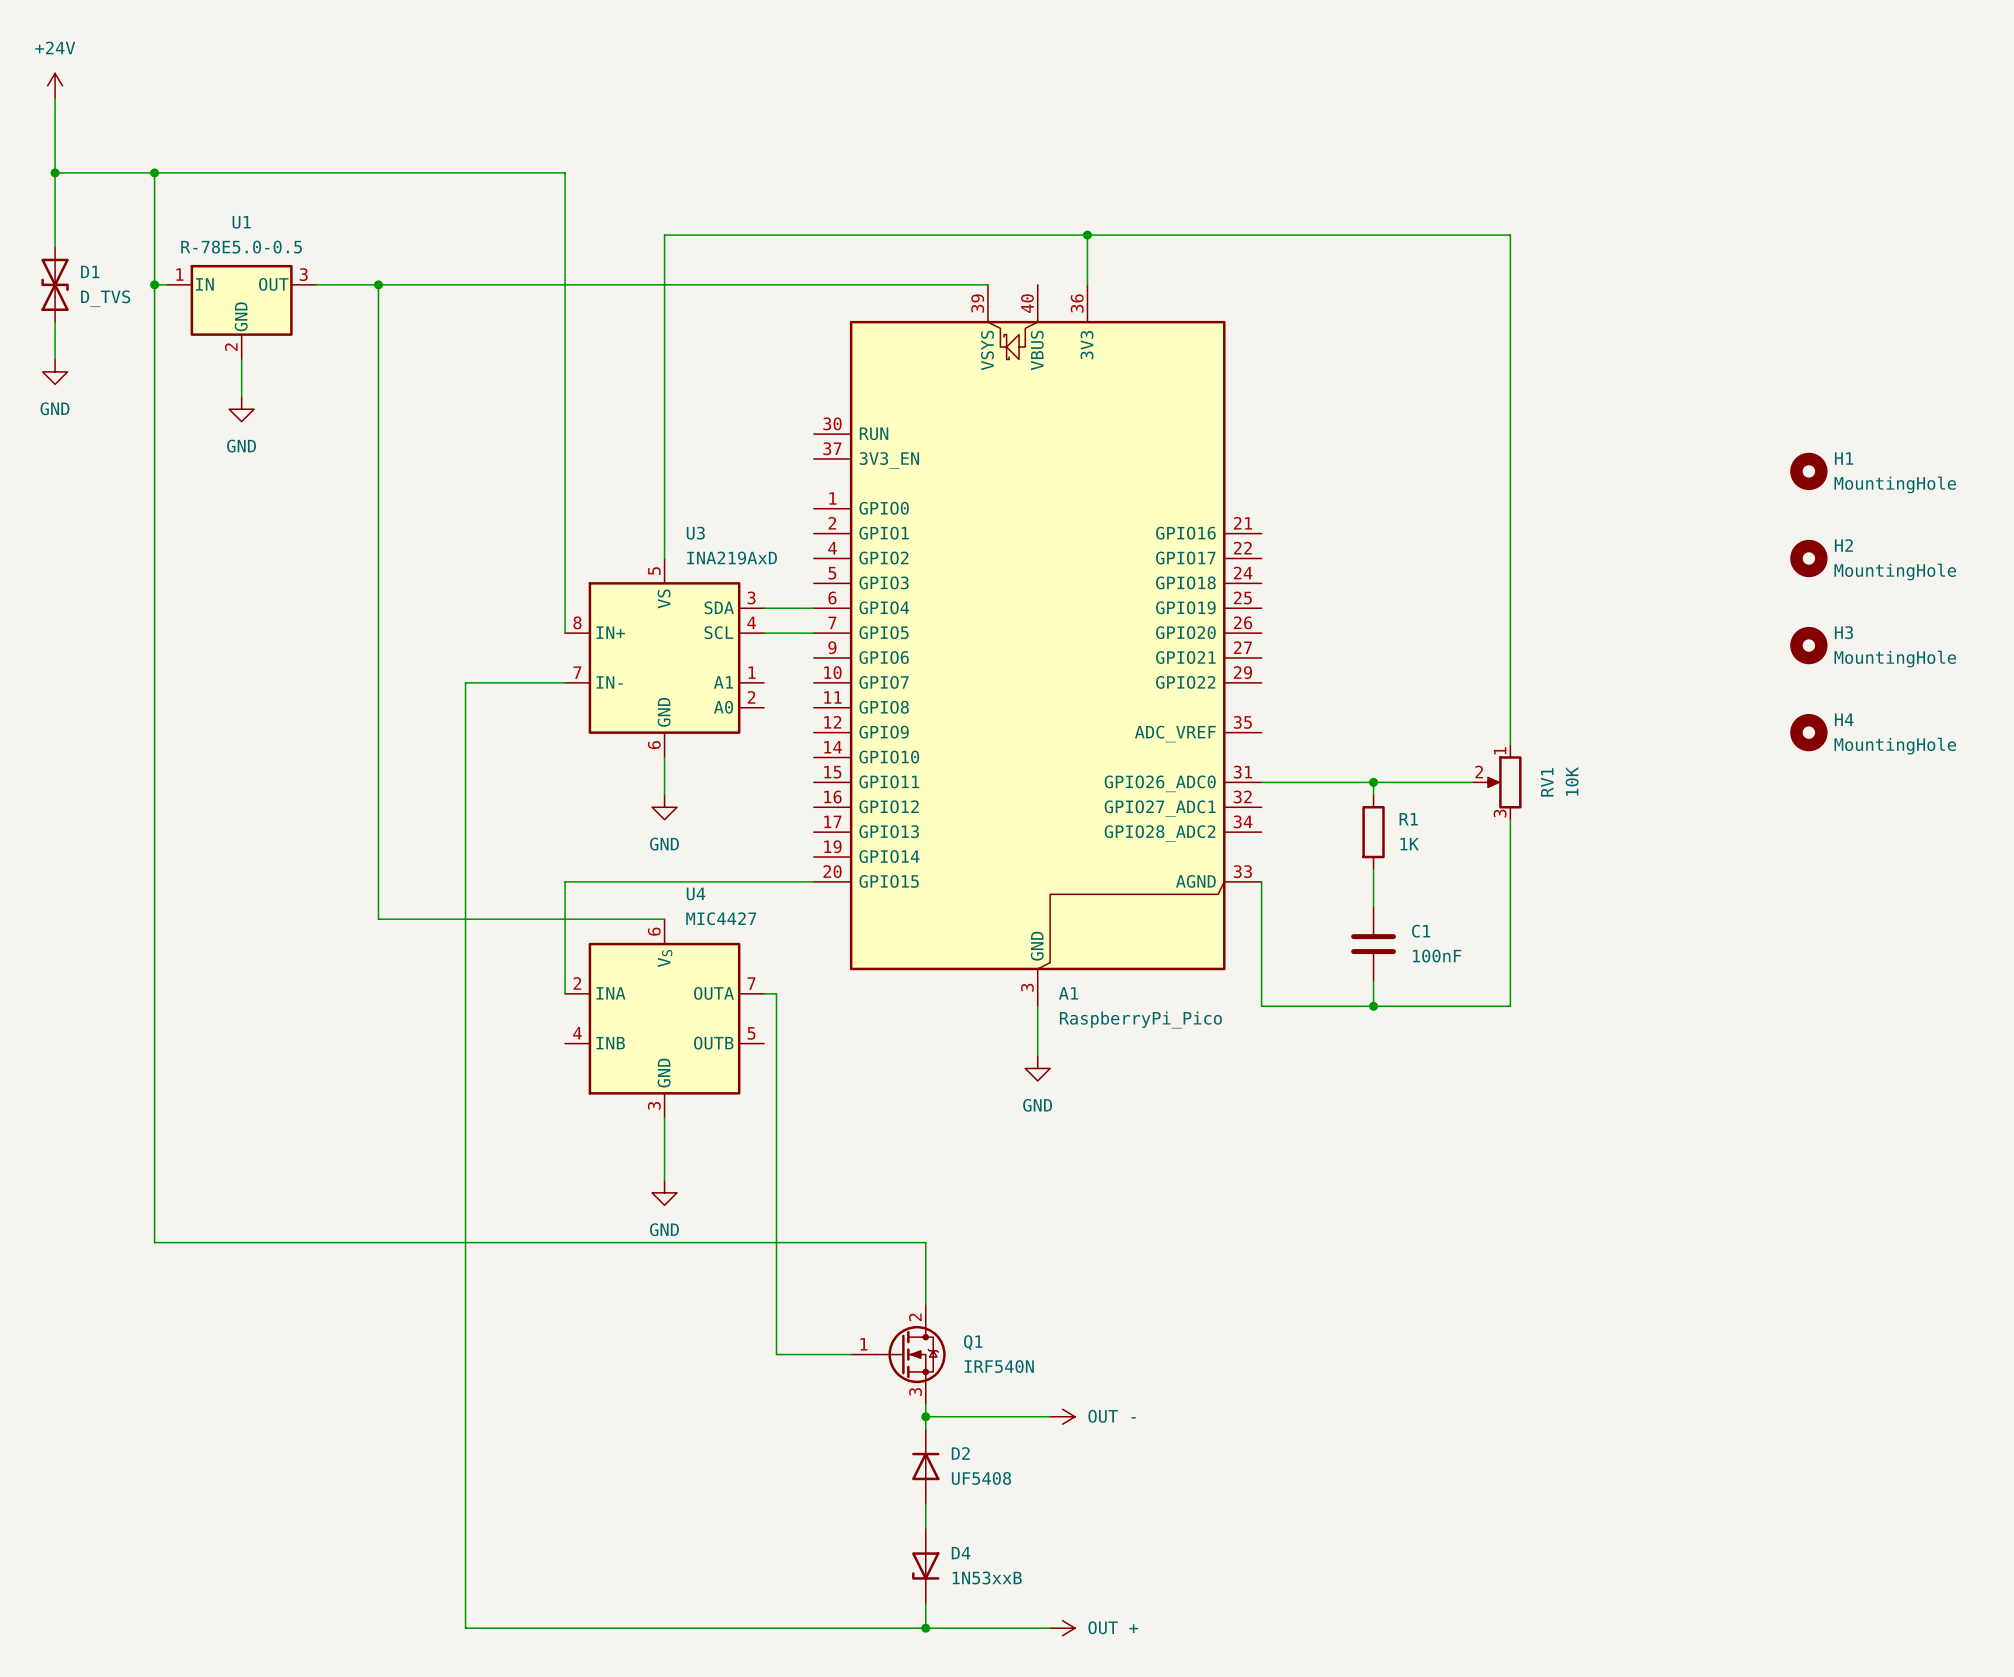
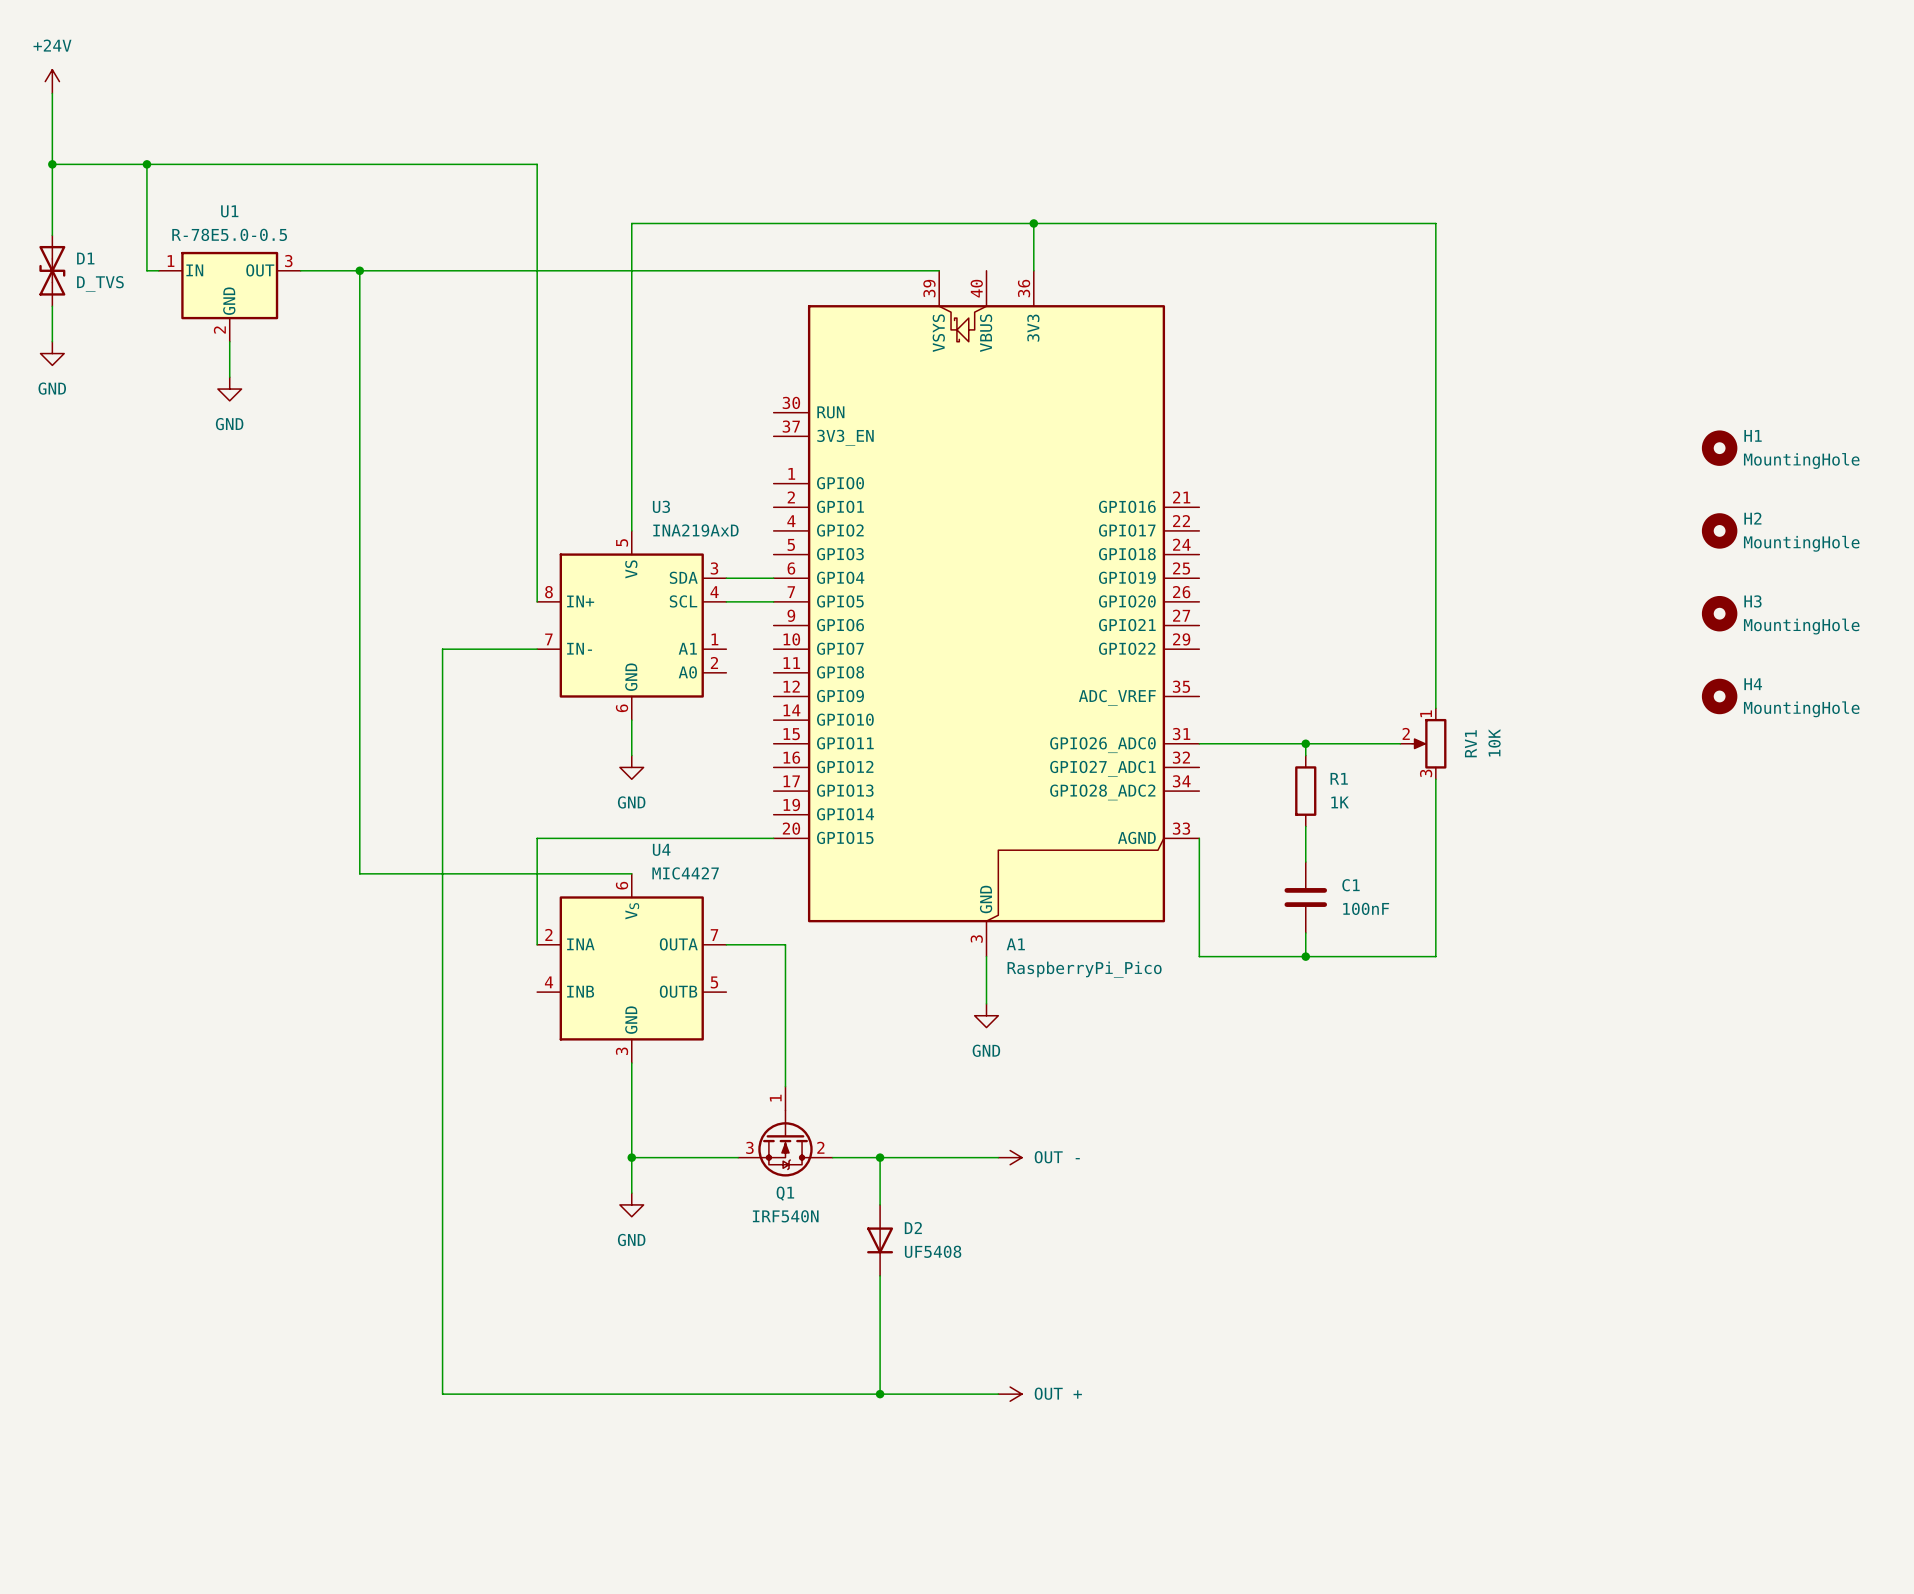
wire: (154, 284) (154, 1242) (925, 1242) -> (880, 1157) (880, 1181)
junction: (154, 284) -> none
wire: (776, 993) (776, 1354) (851, 1354) -> (738, 944) (785, 944) (785, 1086)
wire: none -> (631, 1122) (631, 1193)
power symbol position: GND (664, 1192) -> GND (631, 1204)
wire: none -> (631, 1157) (738, 1157)
junction: none -> (631, 1157)
wire: none -> (832, 1157) (998, 1157)
junction: none -> (880, 1157)
Q1 name position: Q1 (973, 1342) -> Q1 (785, 1193)
Q1 position: (898, 1354) -> (785, 1131)
Q1 rotation: 0° (910, 1354) -> 90° clockwise (785, 1143)
Q1 value position: IRF540N (999, 1366) -> IRF540N (785, 1216)
wire: (925, 1416) (1050, 1416) -> none
junction position: (925, 1416) -> (880, 1394)
power symbol position: OUT - (1062, 1416) -> OUT - (1010, 1157)
wire: (465, 1466) (465, 1628) (1050, 1628) -> (442, 1394) (998, 1394)
D2 rotation: 0° (925, 1466) -> 180° (880, 1240)
D2 position: (925, 1466) -> (880, 1240)
wire: (925, 1503) (925, 1528) -> none
D4: 1N53xxB (925, 1566) -> none
wire: (925, 1603) (925, 1628) -> none
junction: (925, 1628) -> none
power symbol position: OUT + (1062, 1628) -> OUT + (1010, 1394)

